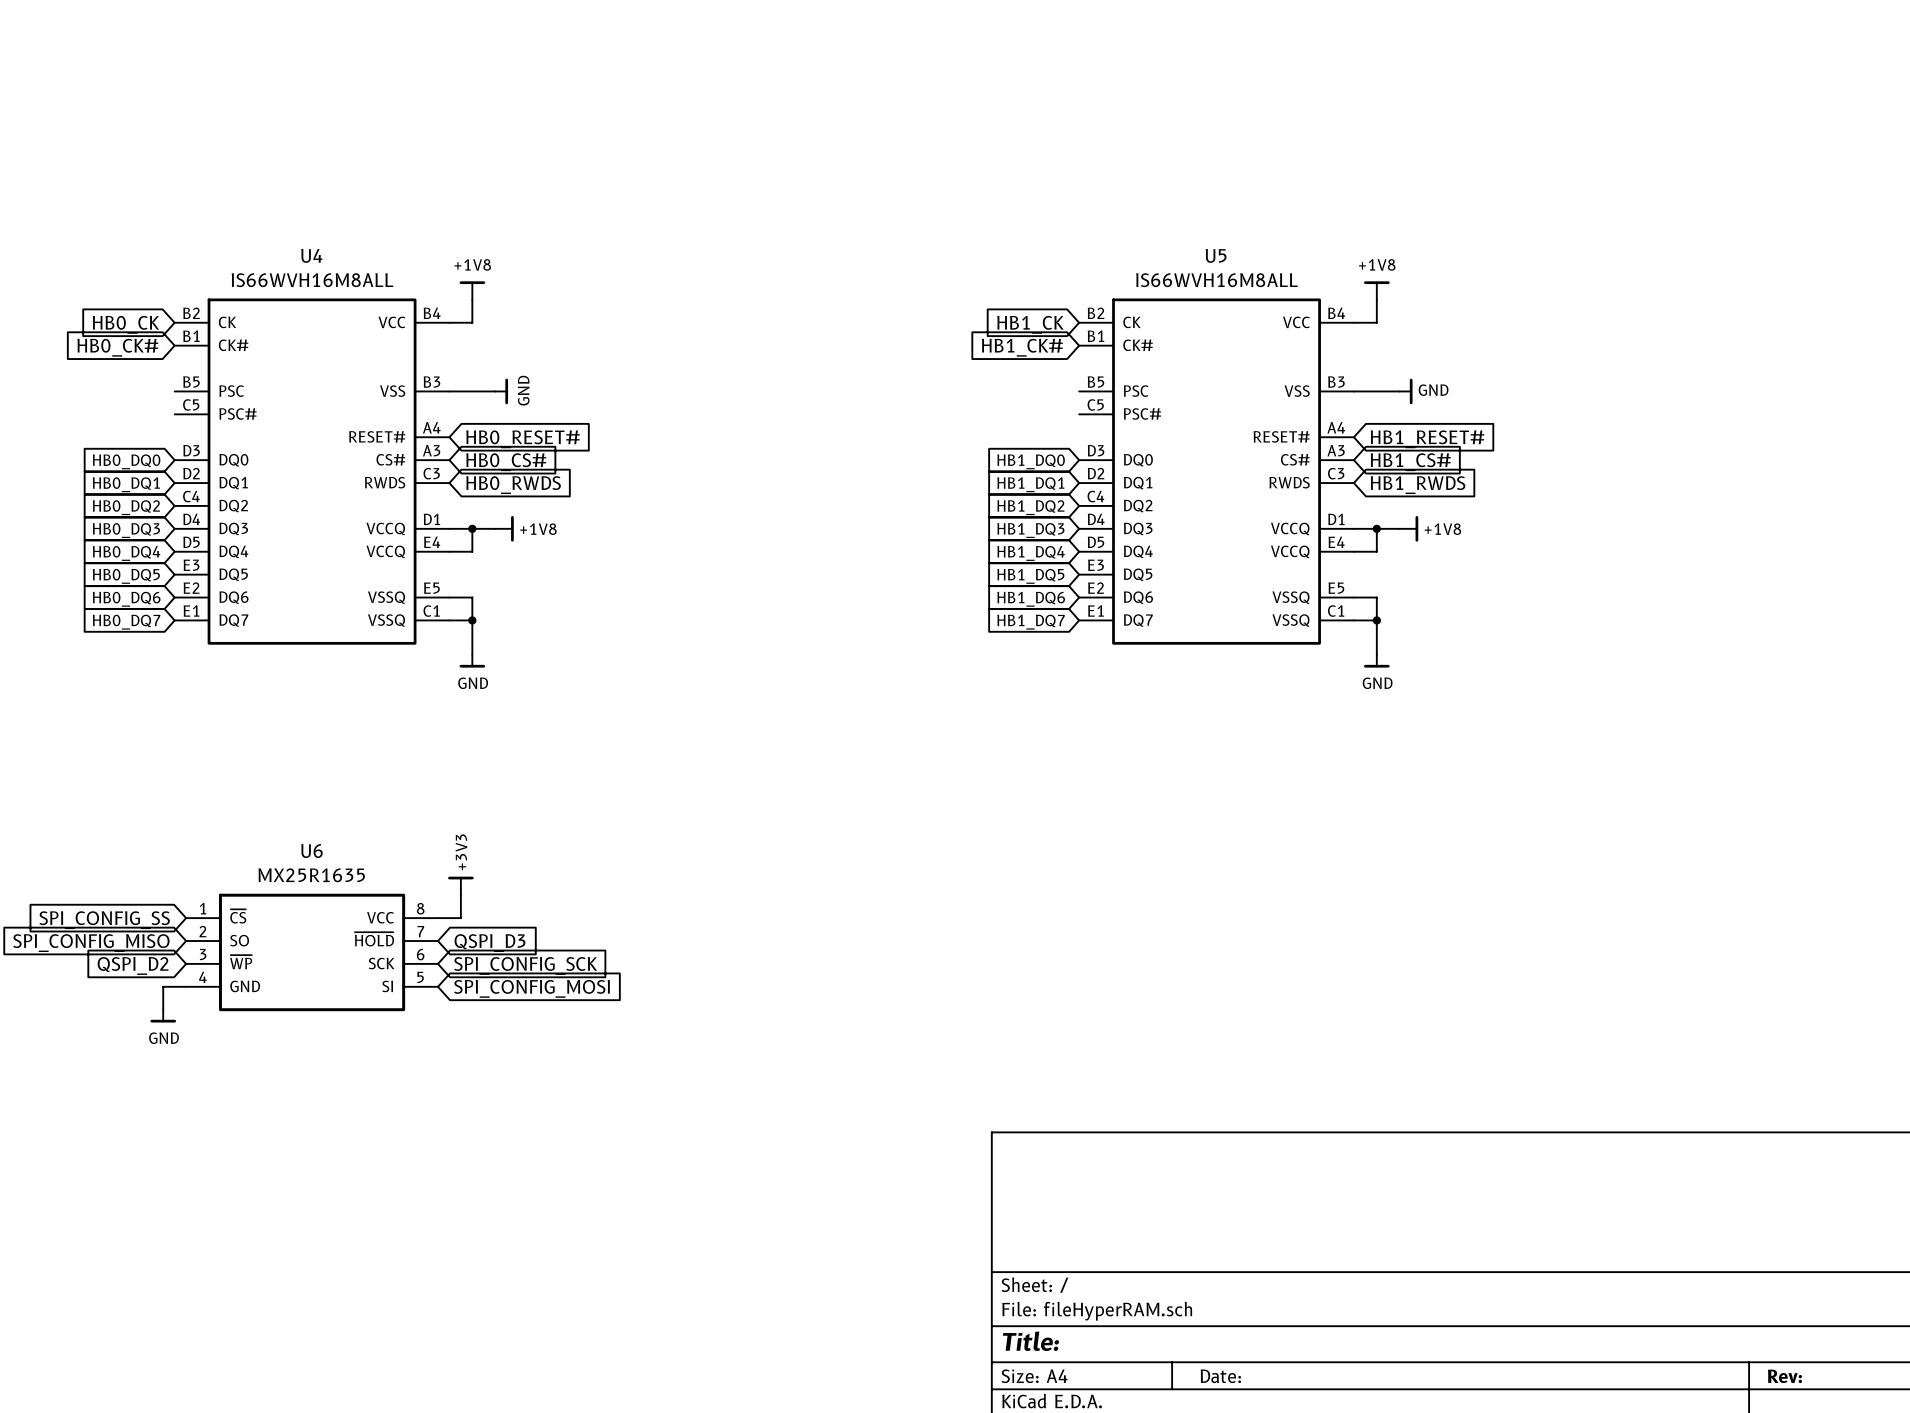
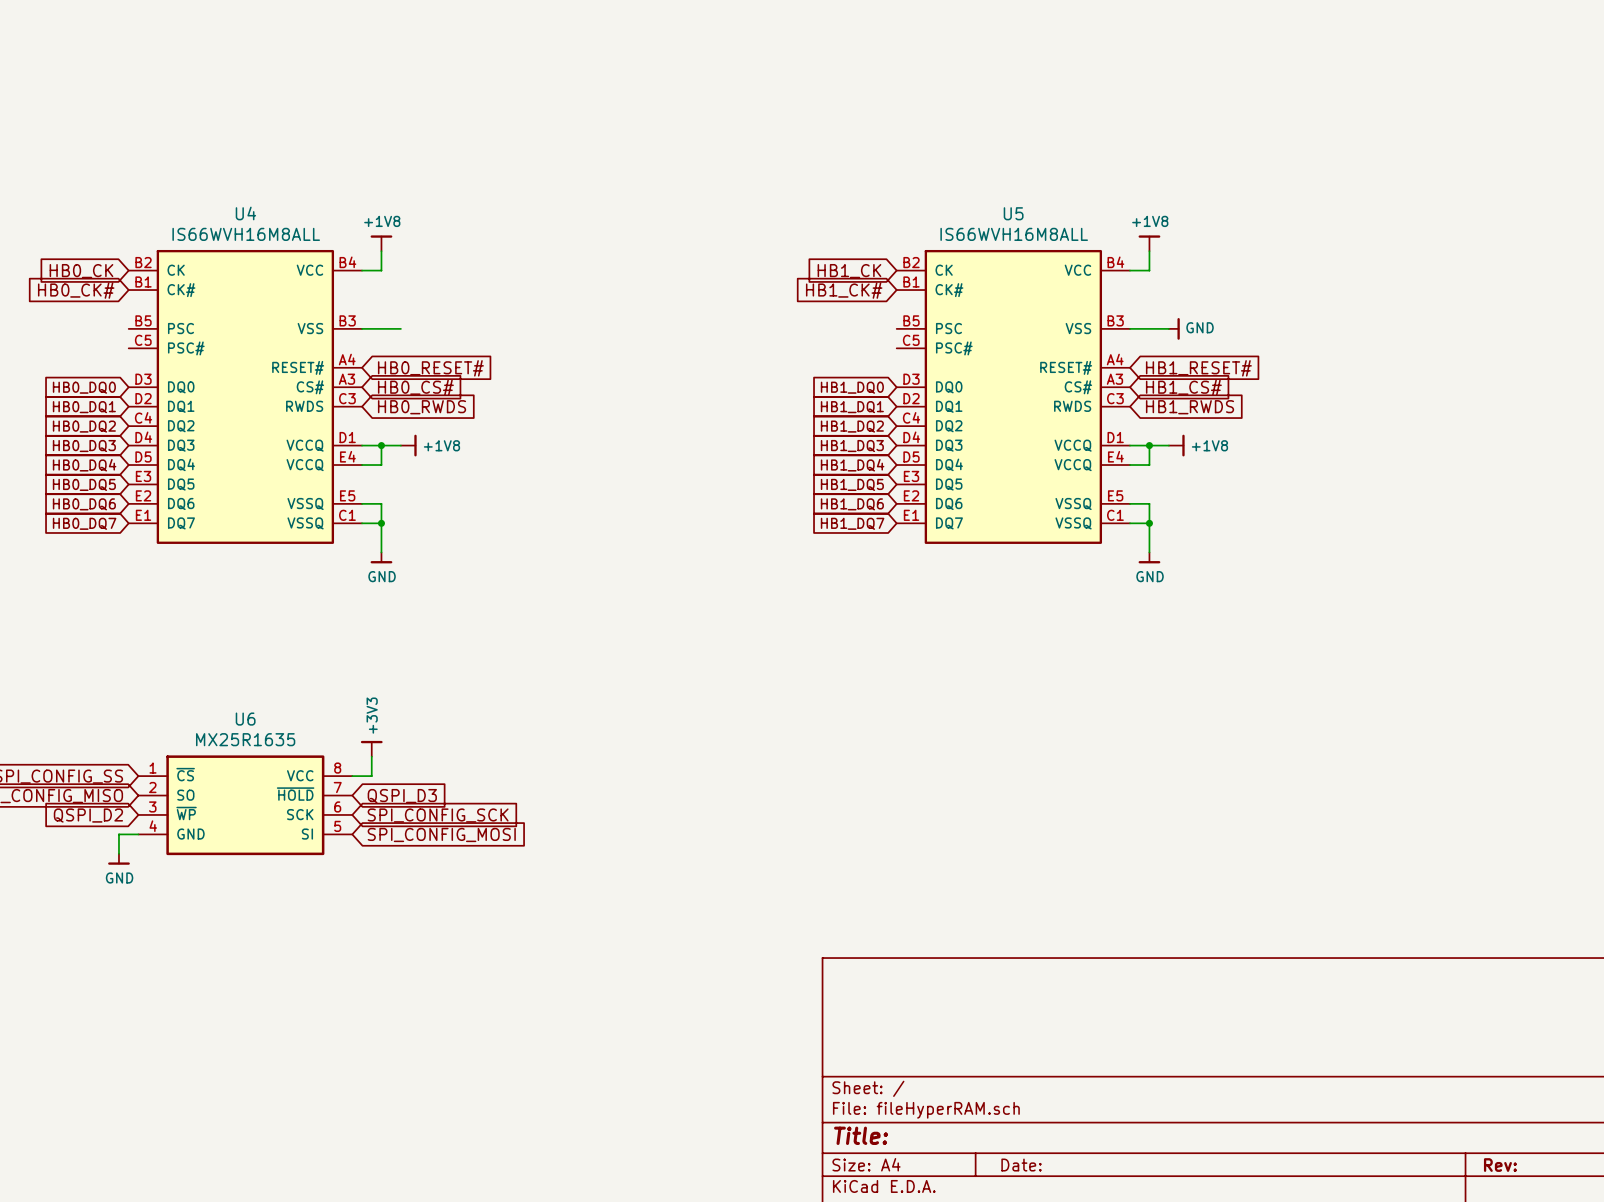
power symbol: GND (501, 391) -> none

